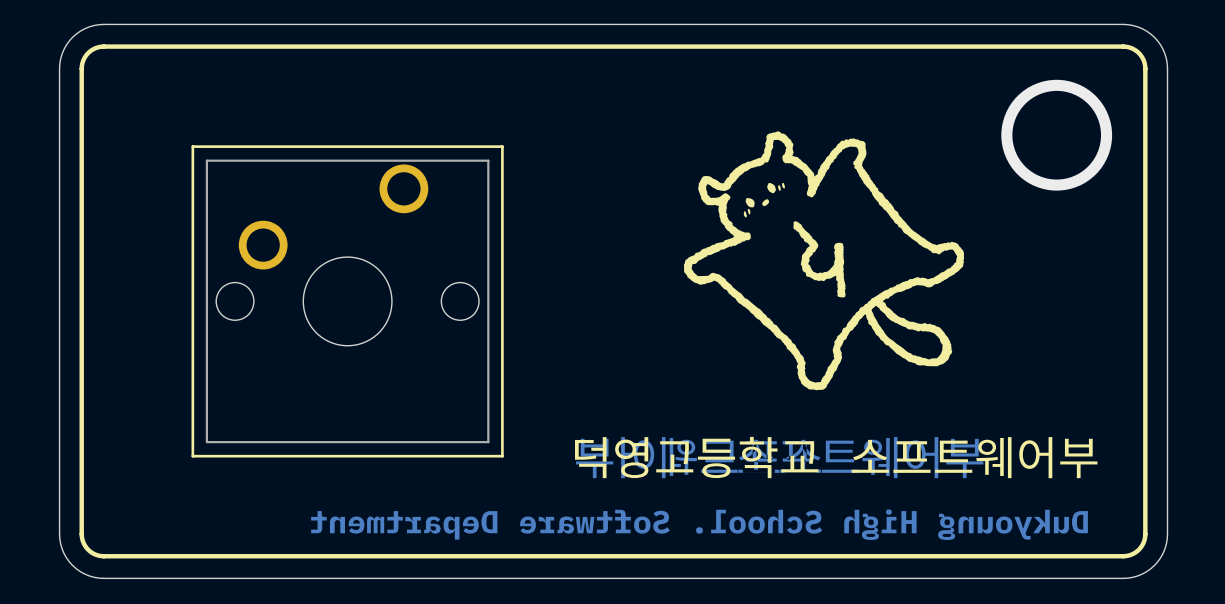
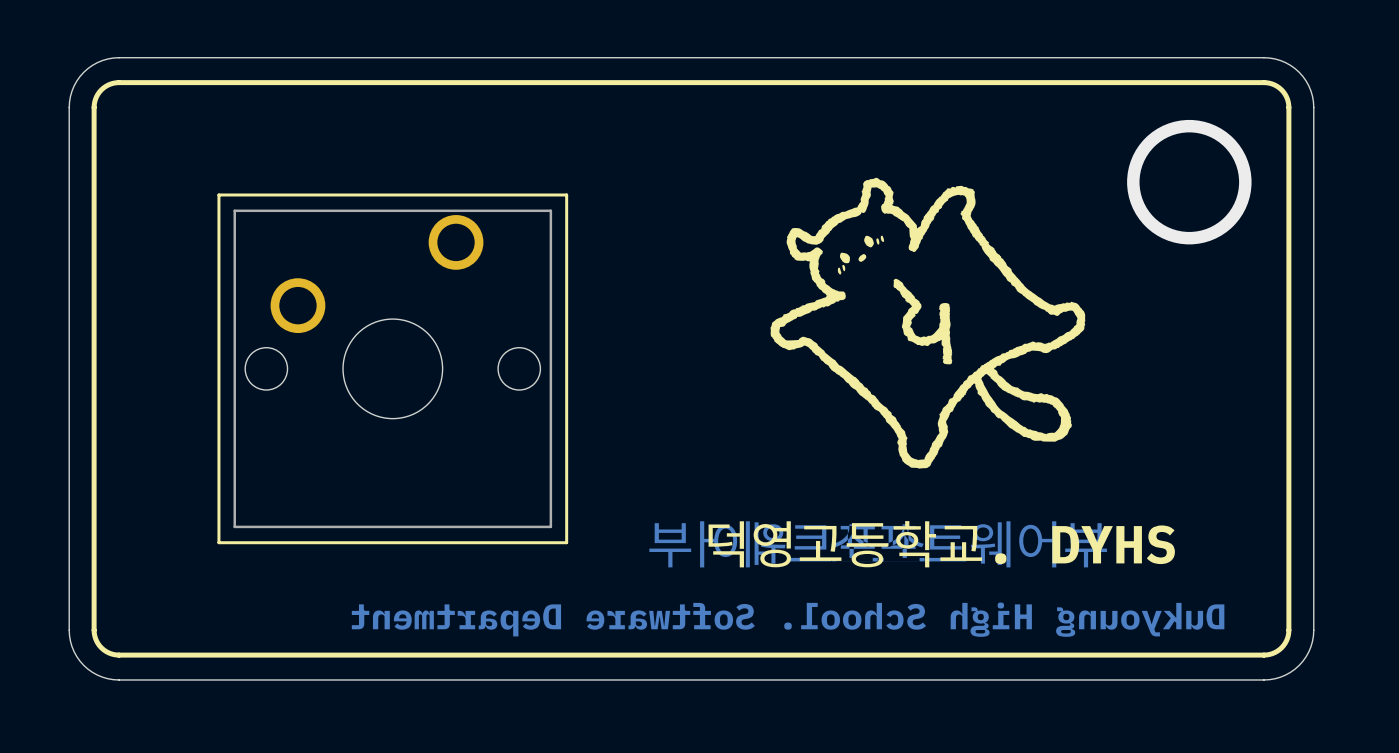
text: 덕영고등학교 소프트웨어부 (836, 457) -> 덕영고등학교. DYHS (941, 544)

